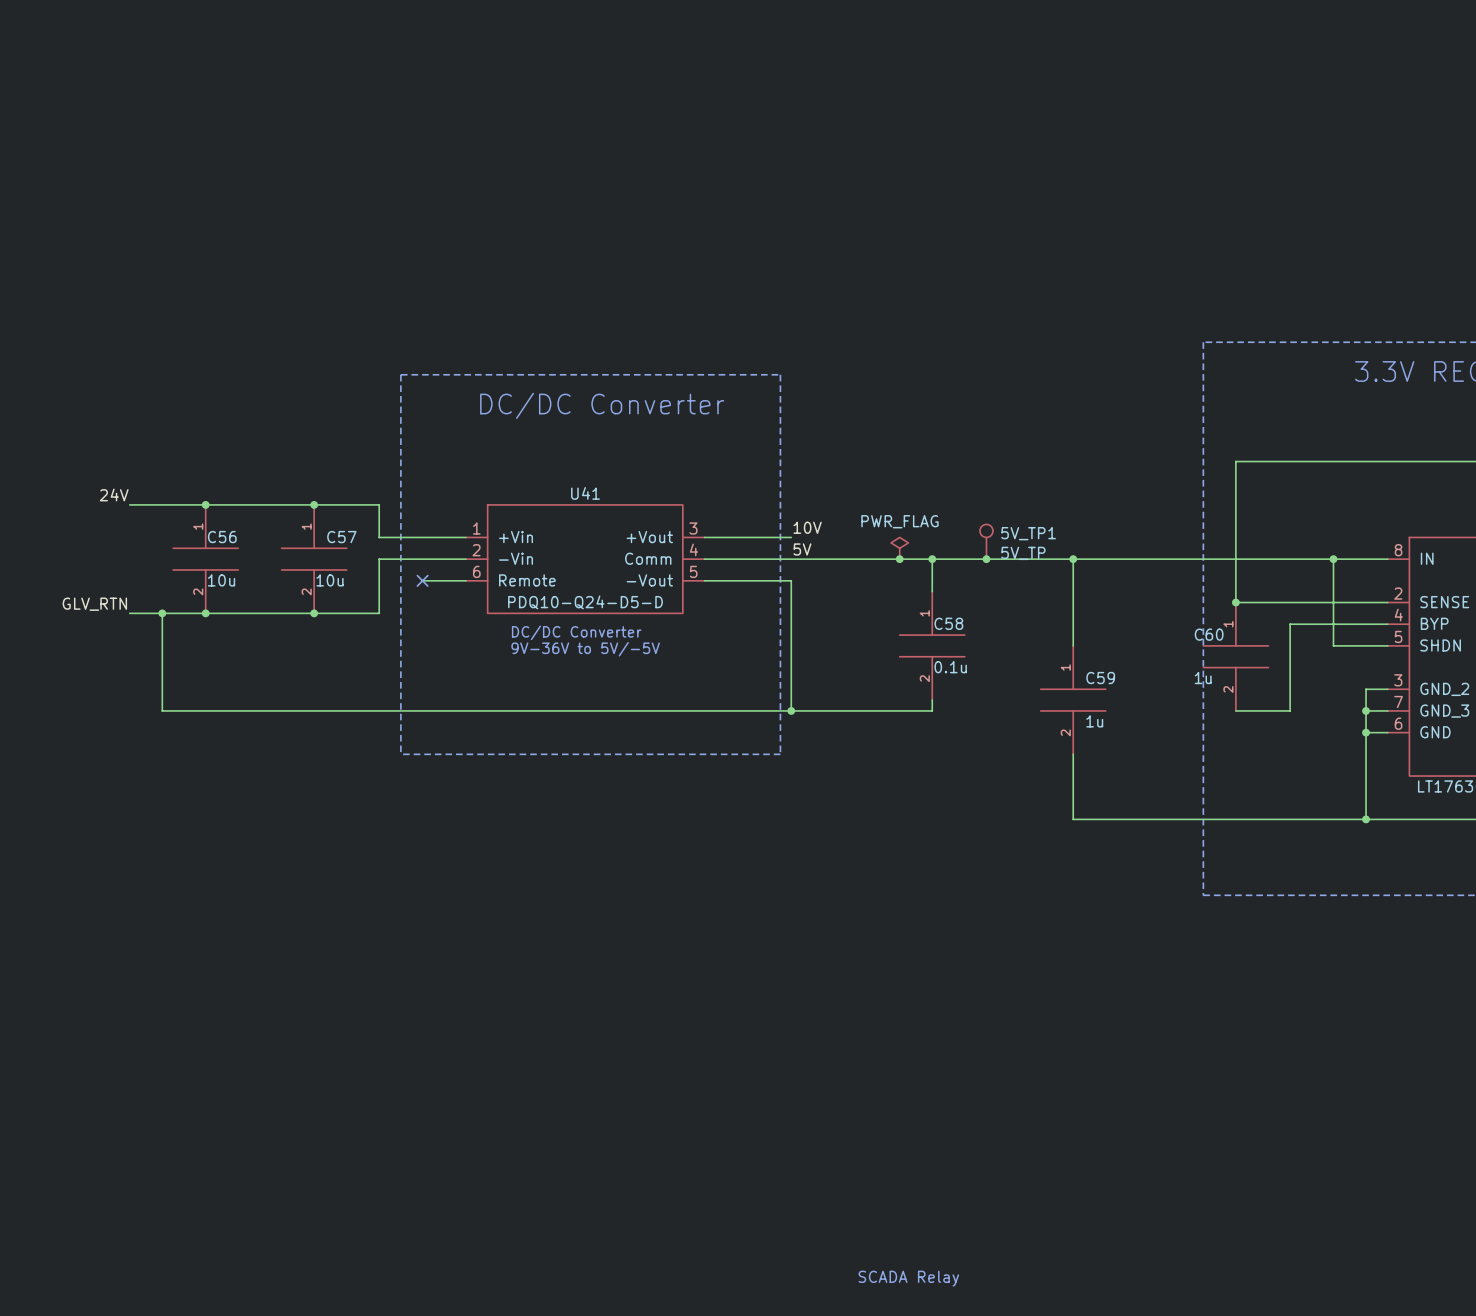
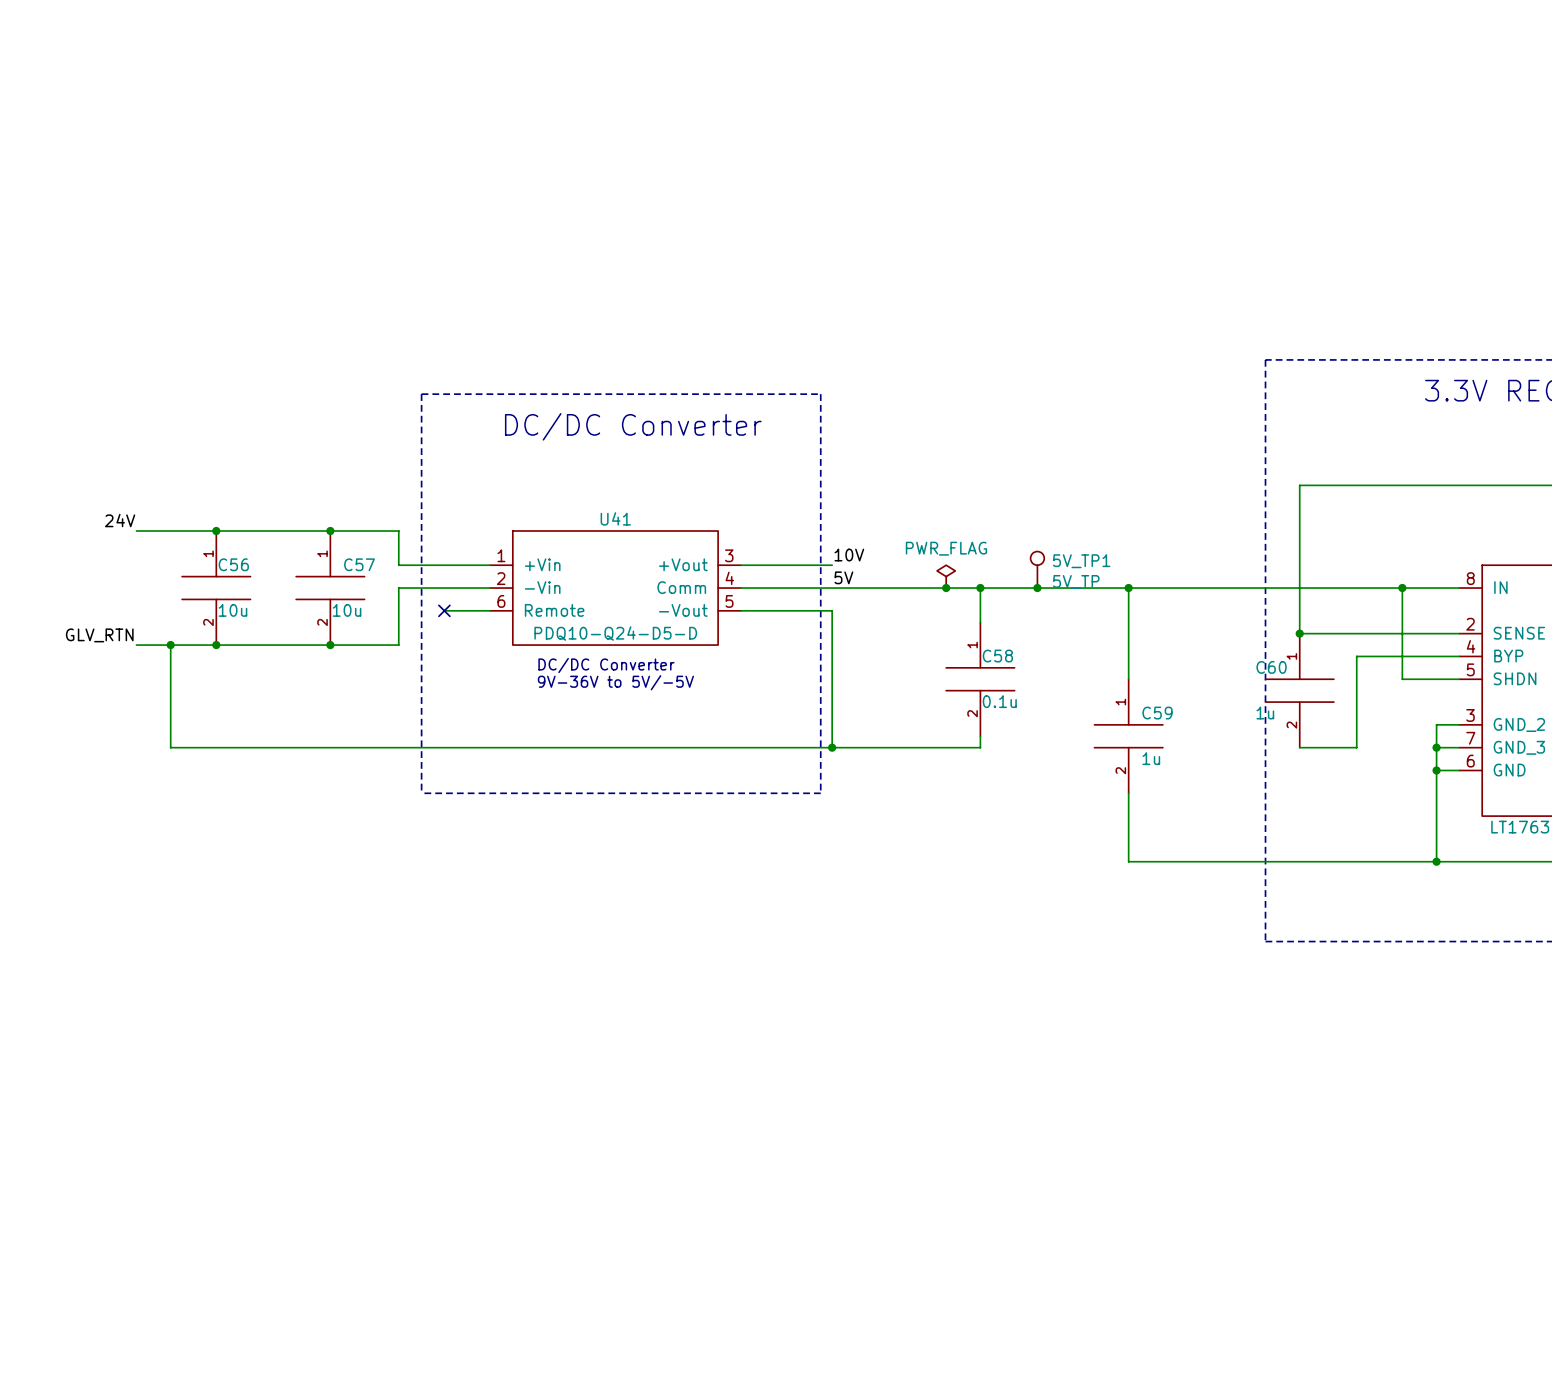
text: SCADA Relay (908, 1278) -> none

